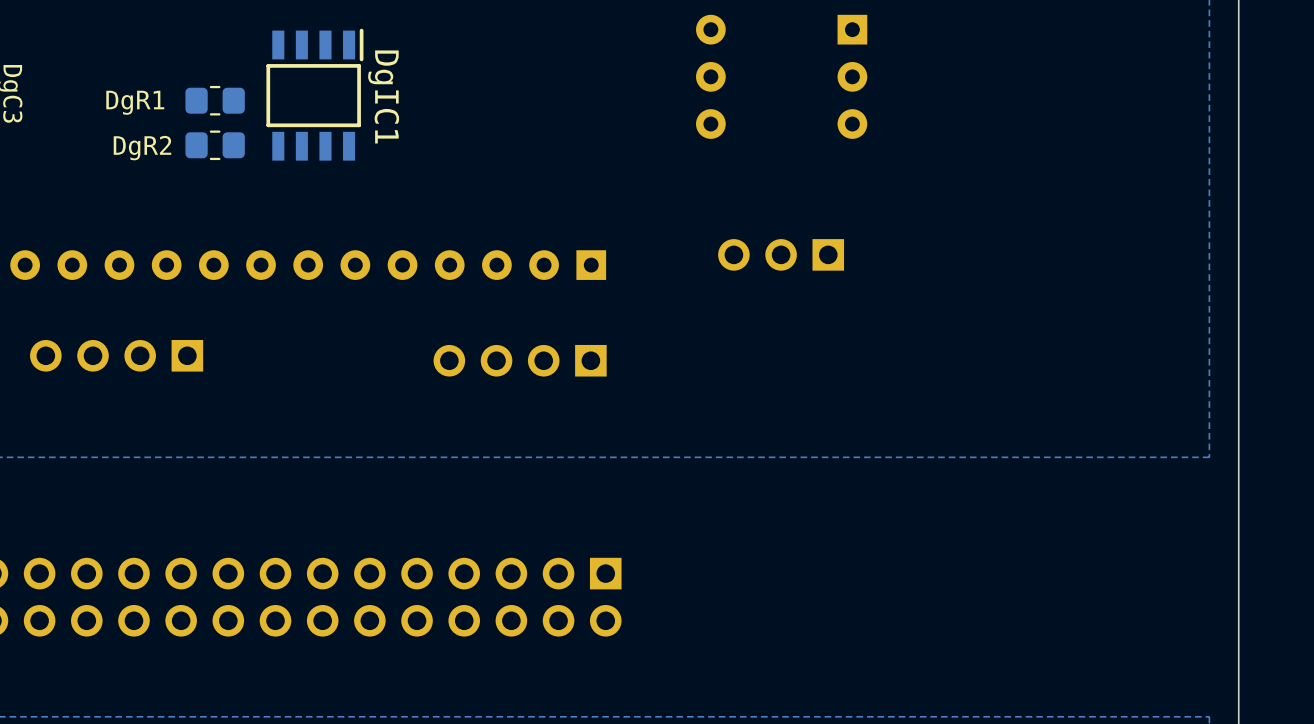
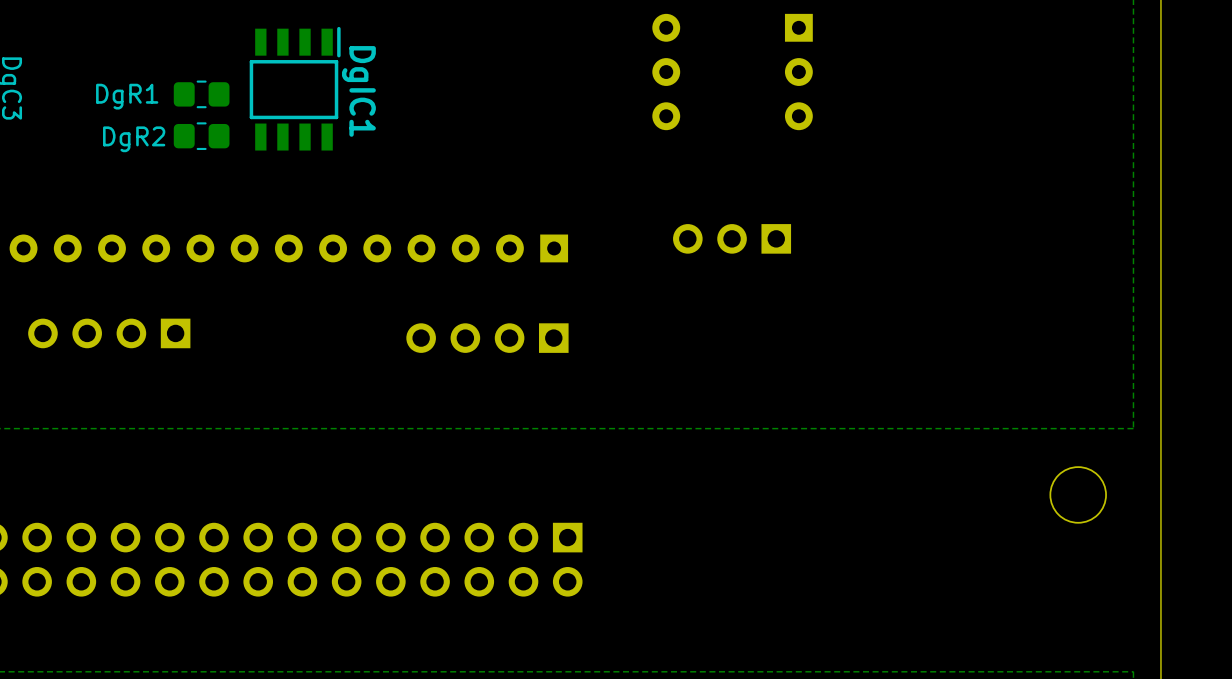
round board edge: none -> [1049, 466, 1107, 524]

